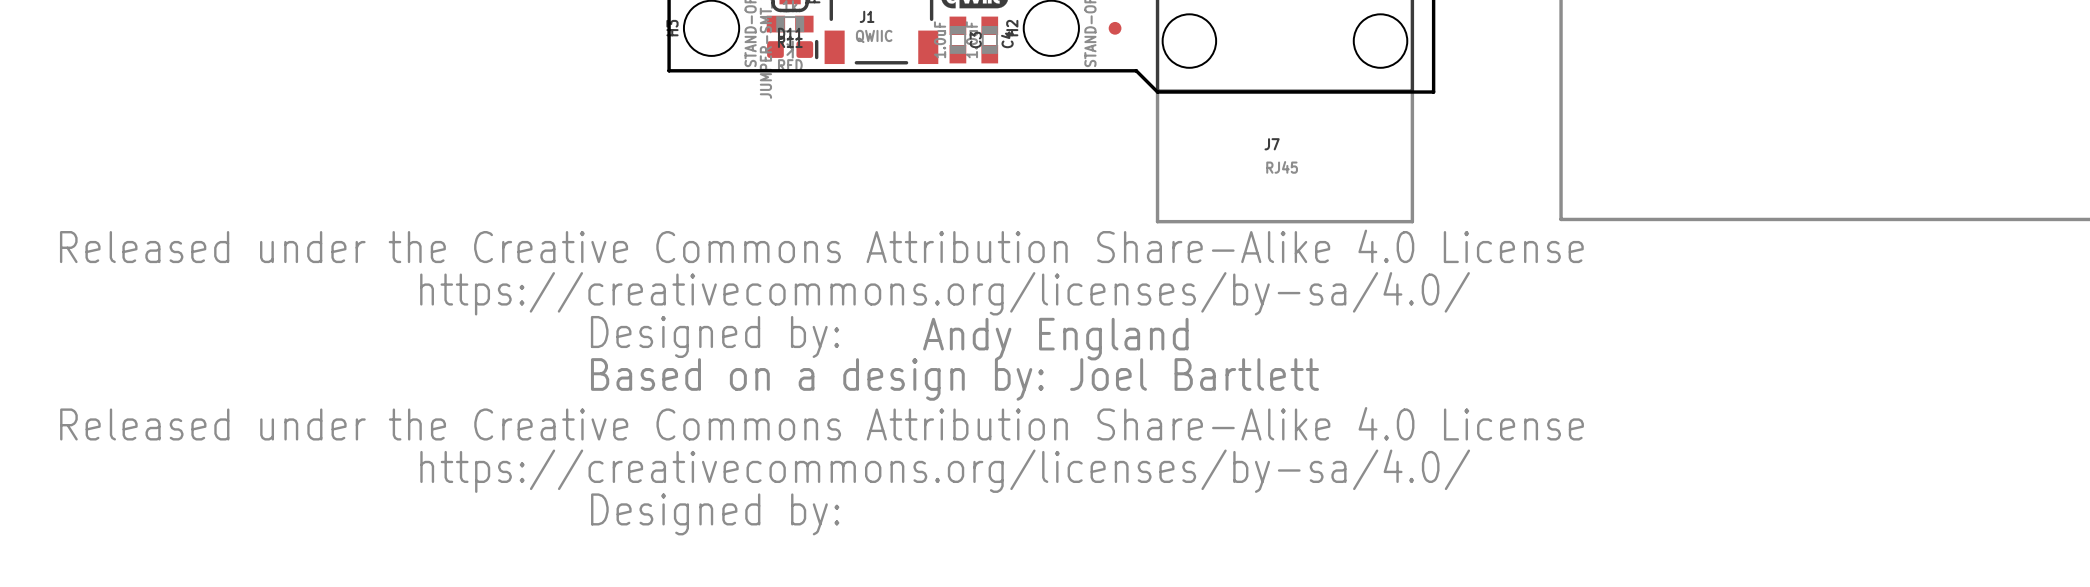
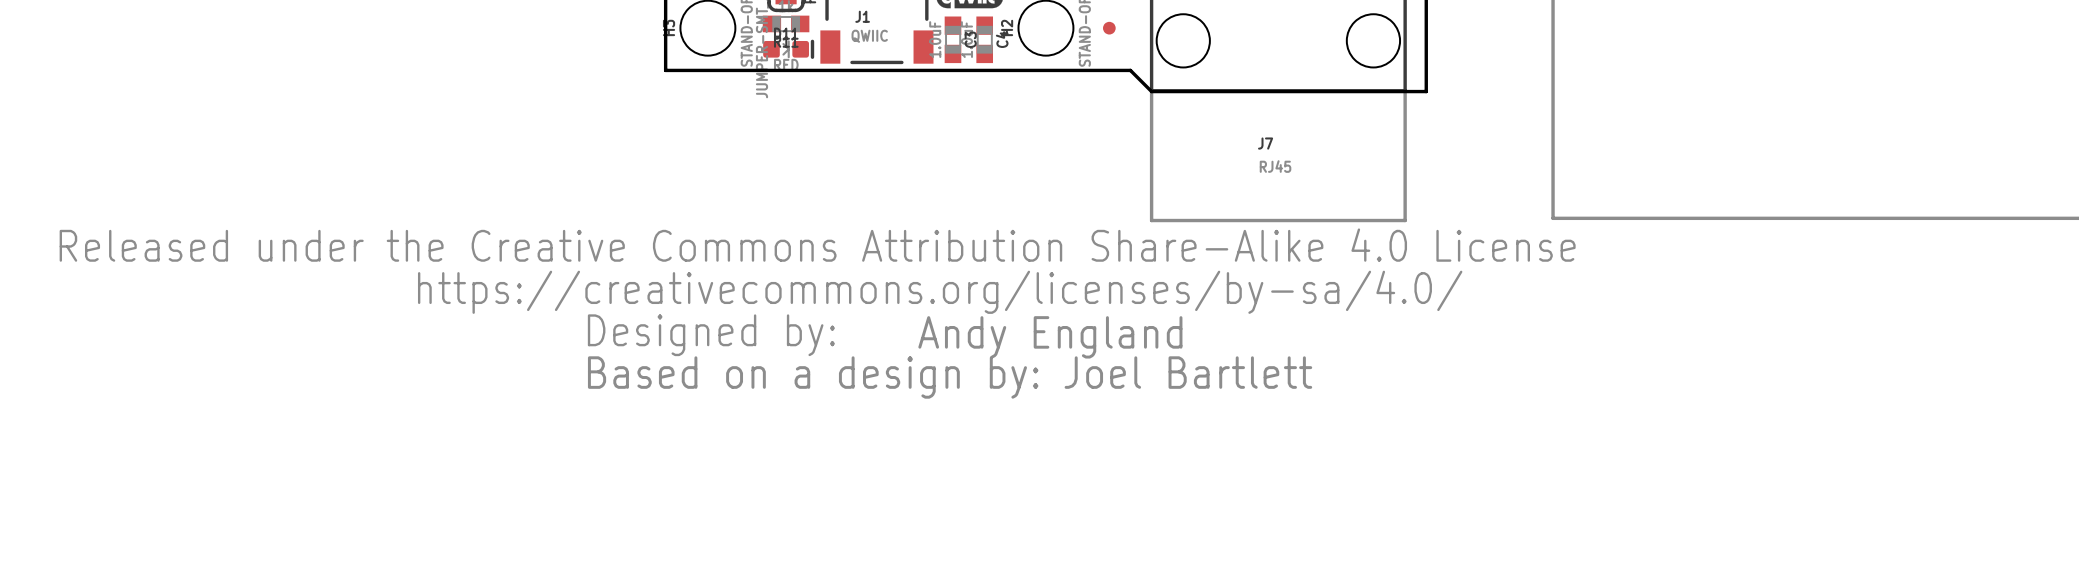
drawing: [60, 407, 1584, 536] -> none

